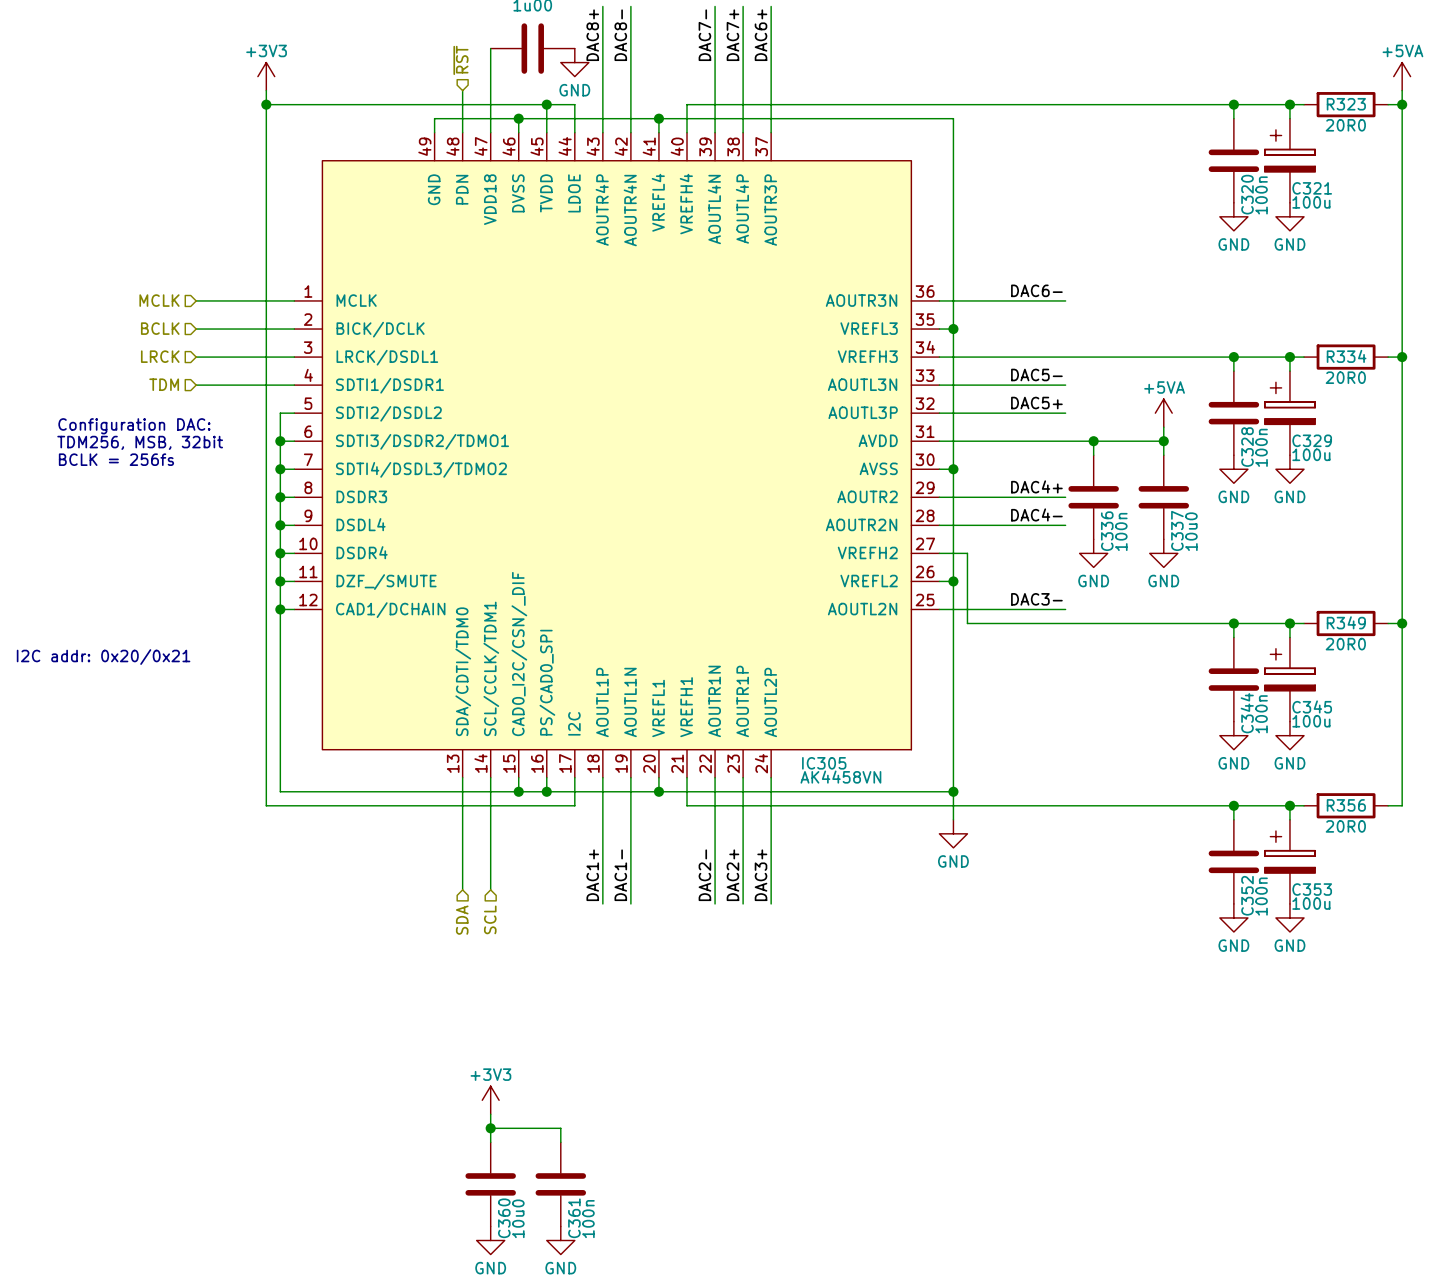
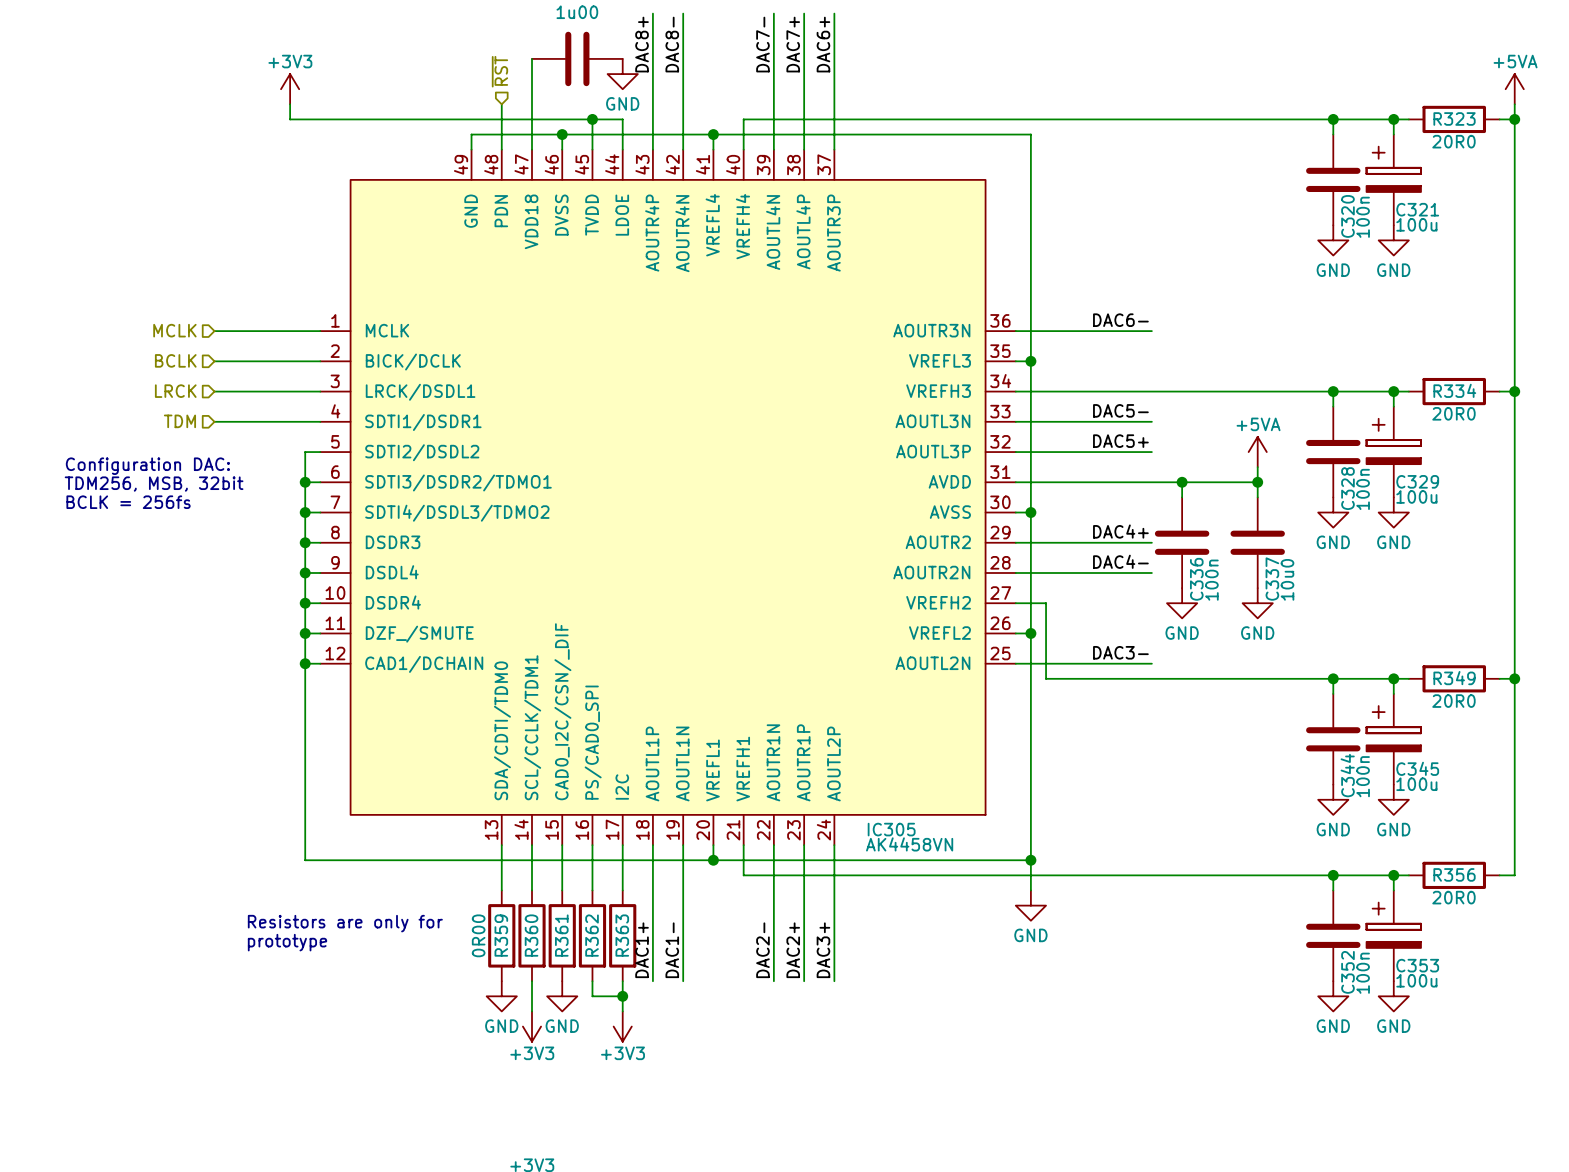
wire: (266, 104) (266, 805) (574, 805) -> (622, 890) (622, 875)
junction: (266, 104) -> none
text: I2C addr: 0x20/0x21 (103, 657) -> none
wire: none -> (562, 860) (562, 890)
junction: (518, 791) -> none
wire: none -> (592, 860) (592, 890)
junction: (546, 791) -> none
wire: (462, 819) (462, 889) -> none
wire: (490, 819) (490, 889) -> none
text: none -> Resistors are only for (345, 923)
R359: none -> (501, 935)
R360: none -> (532, 935)
R361: none -> (562, 935)
R362: none -> (592, 935)
R363: none -> (622, 935)
text: none -> prototype (287, 942)
wire: none -> (532, 981) (532, 1011)
wire: none -> (592, 981) (592, 996) (622, 996)
wire: none -> (622, 981) (622, 1011)
power symbol: none -> GND (501, 996)
power symbol: none -> GND (562, 996)
junction: none -> (622, 996)
hierarchical label: SCL (490, 919) -> none
hierarchical label: SDA (462, 920) -> none
power symbol: none -> +3V3 (532, 1026)
power symbol: none -> +3V3 (622, 1026)

